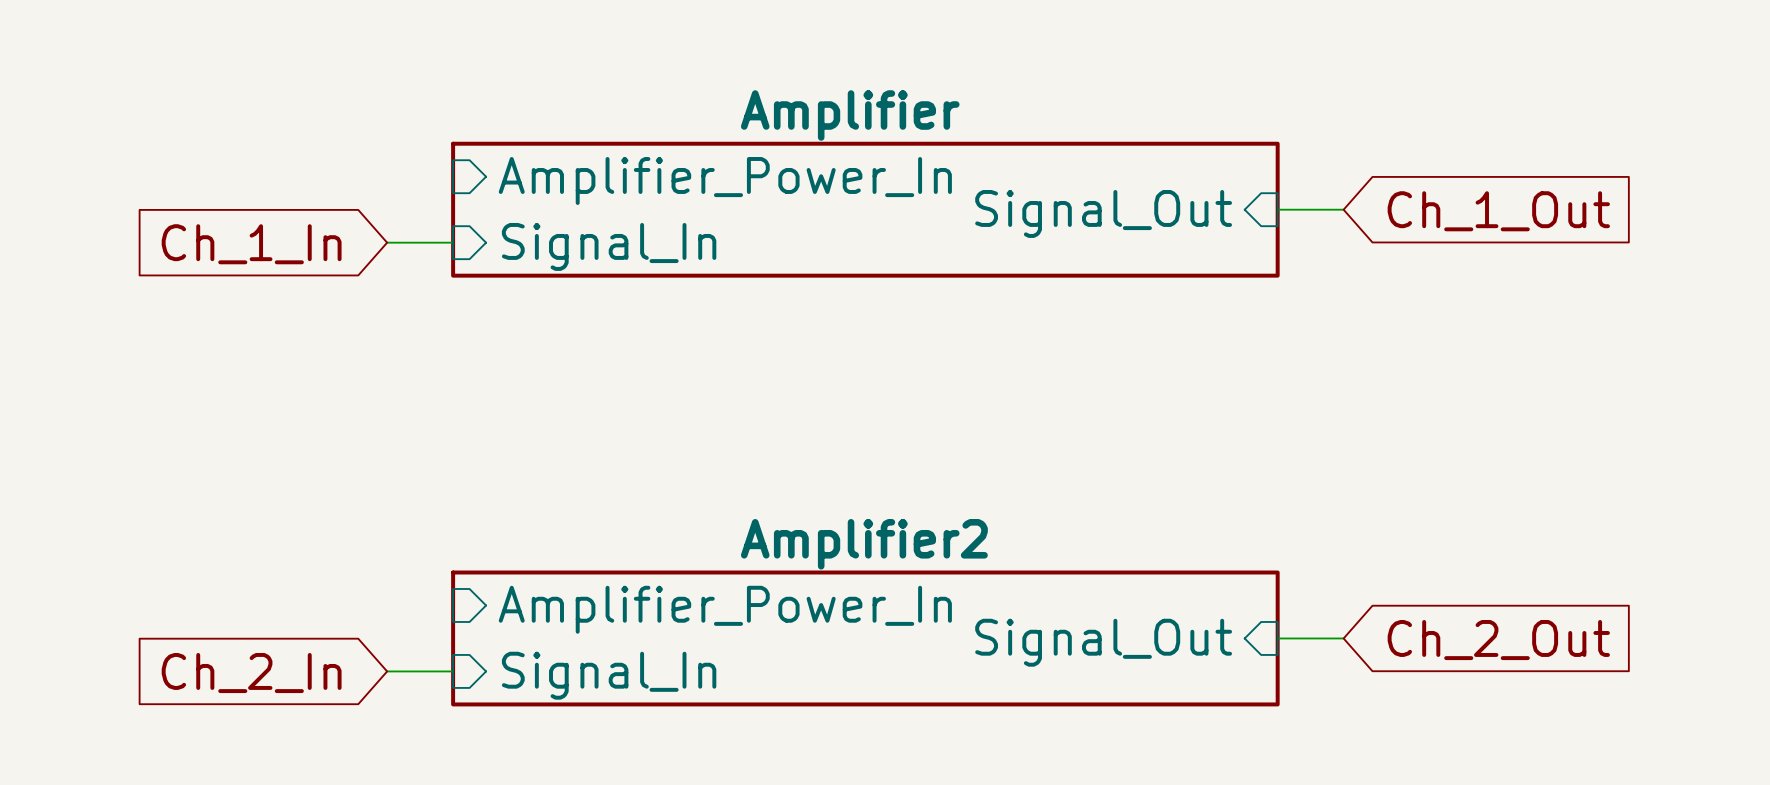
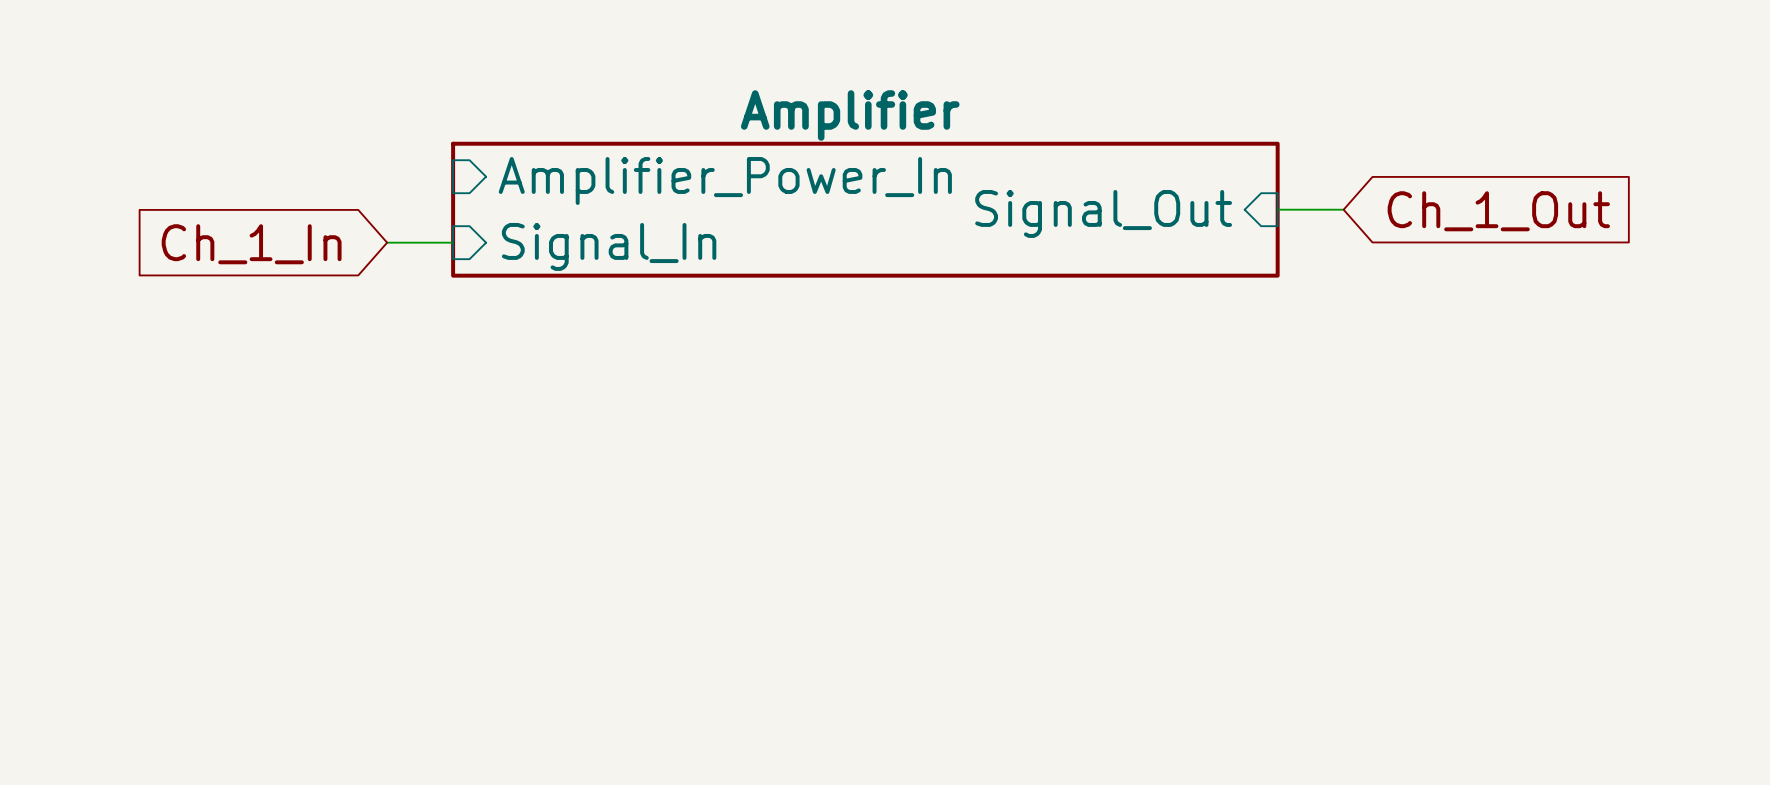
sheet pin: Amplifier_Power_In (725, 609) -> none
sheet Amplifier2: (865, 638) -> none
wire: (1277, 638) (1343, 638) -> none
global label: Ch_2_Out (1498, 640) -> none
sheet pin: Signal_Out (1103, 642) -> none
wire: (387, 671) (453, 671) -> none
global label: Ch_2_In (251, 673) -> none
sheet pin: Signal_In (609, 675) -> none

